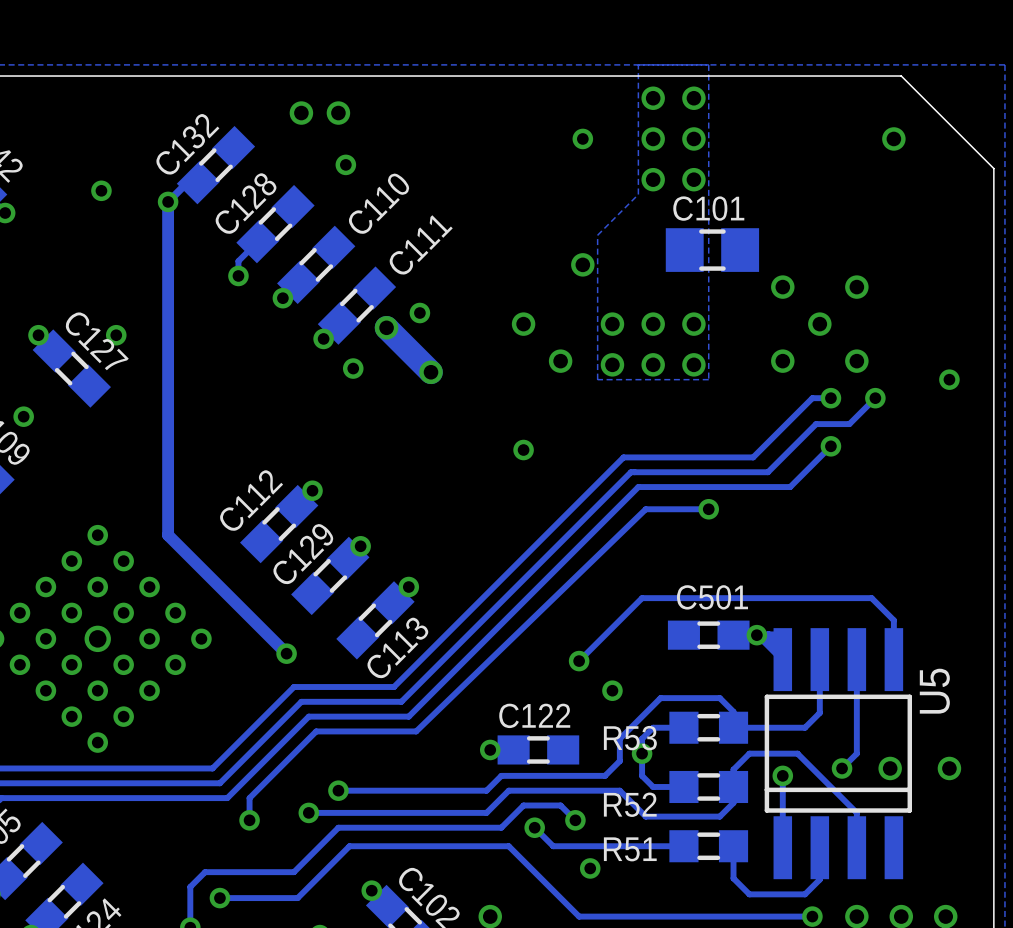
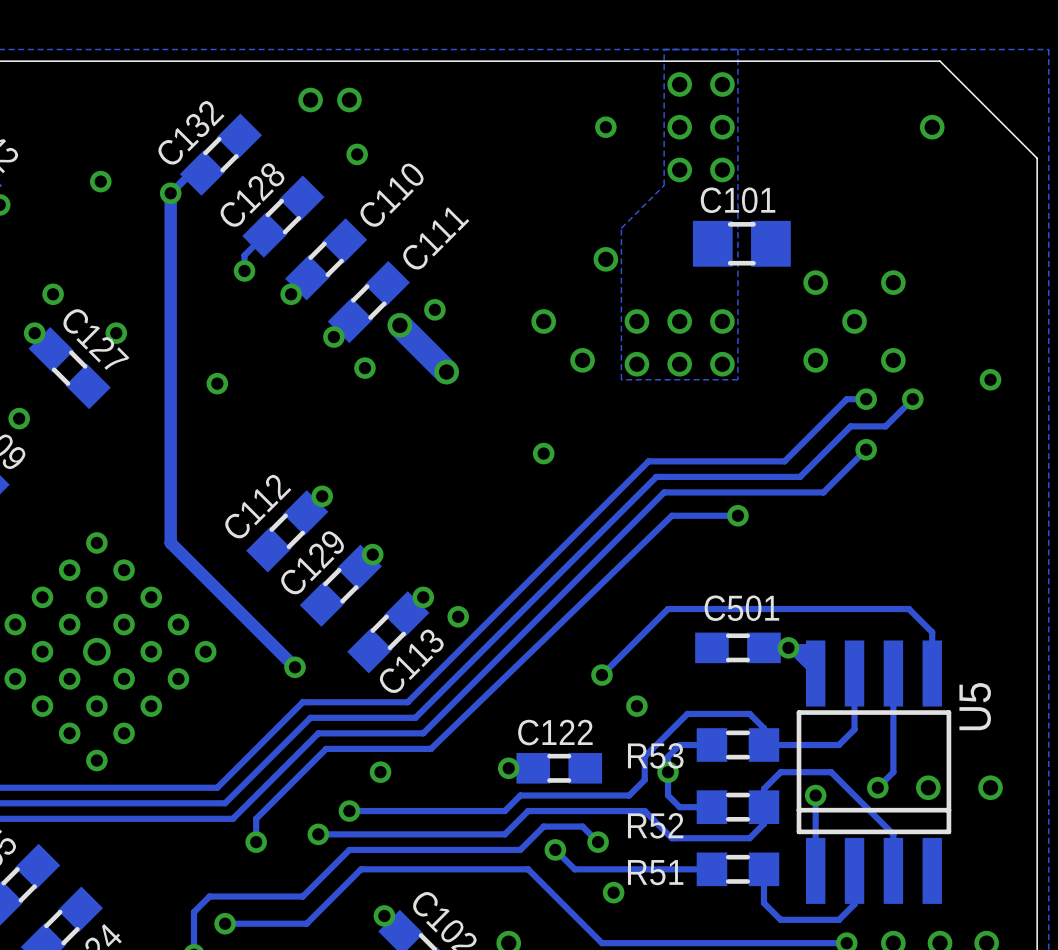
via: none -> (53, 294)
via: none -> (217, 383)
via: none -> (458, 616)
via: none -> (380, 772)

